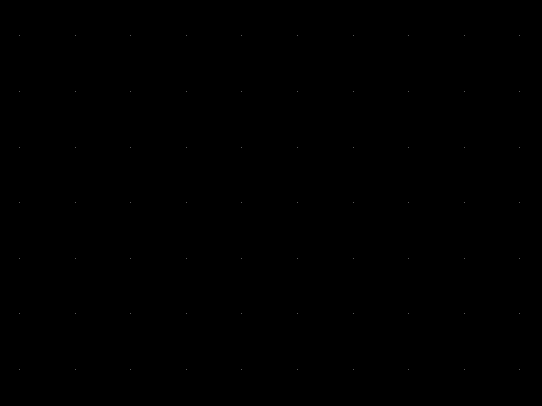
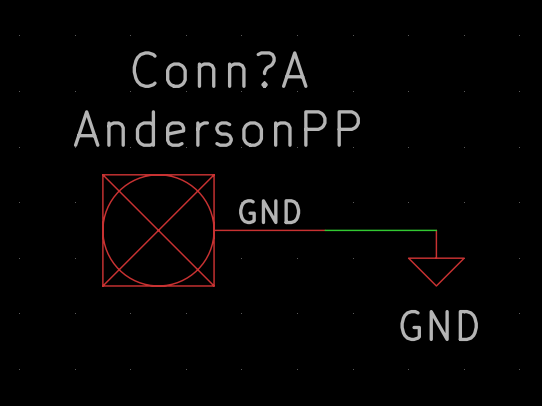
Conn?A: none -> AndersonPP (214, 230)
wire: none -> (325, 230) (436, 230)
power symbol: none -> GND (436, 258)

